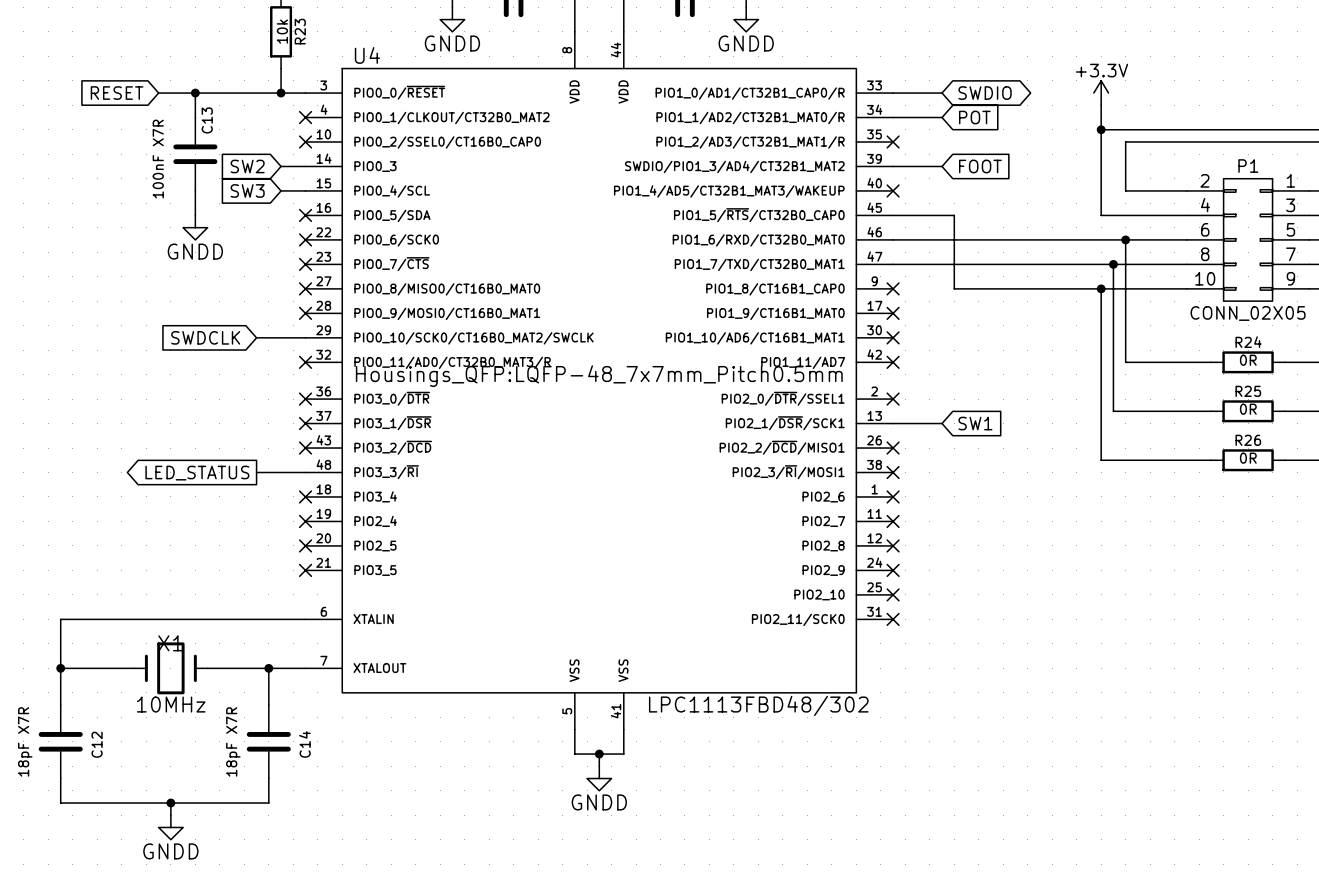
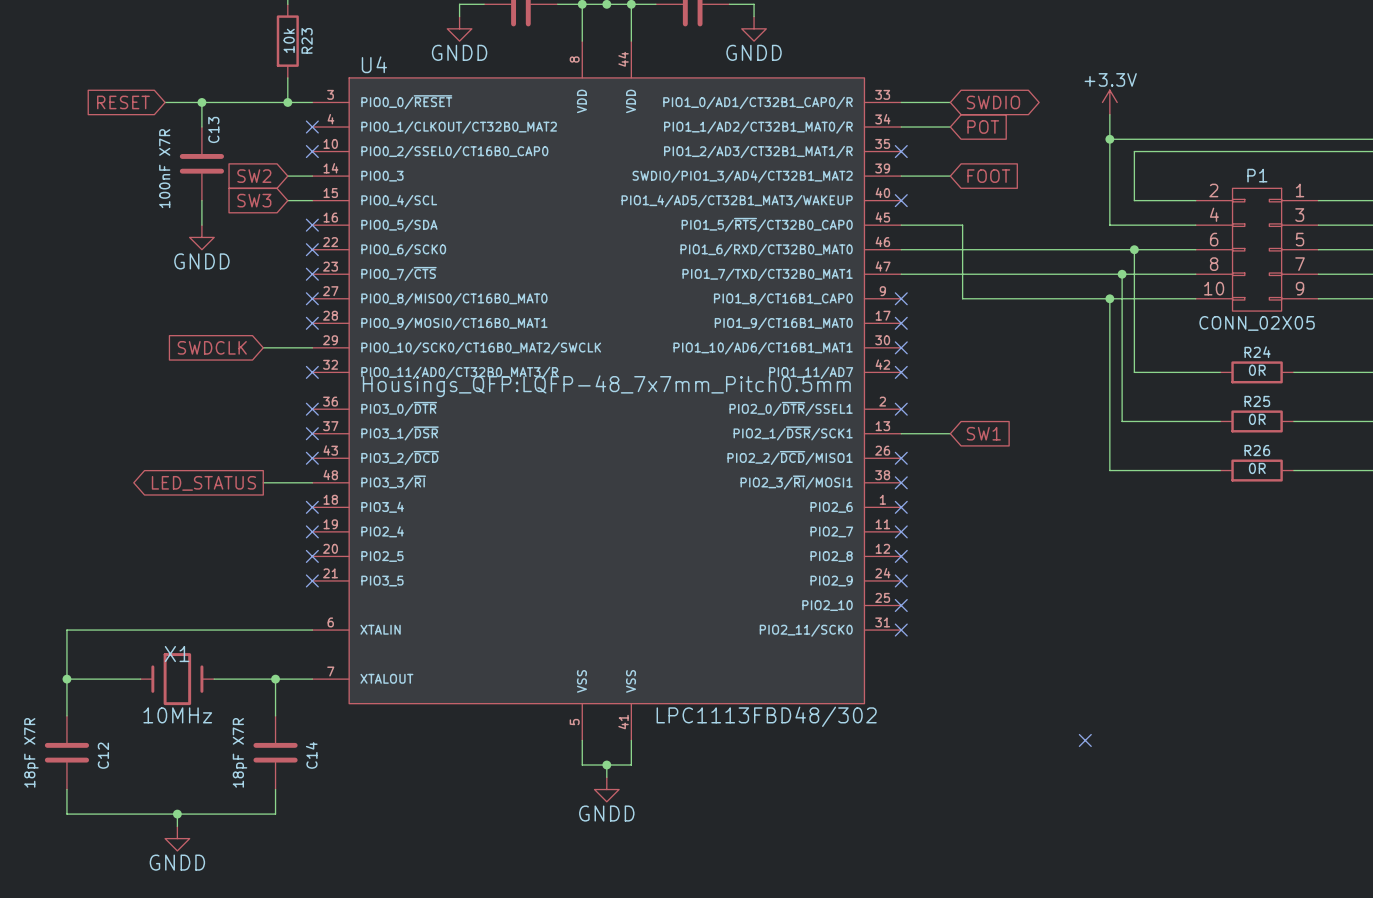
no-connect mark: none -> (1085, 740)

